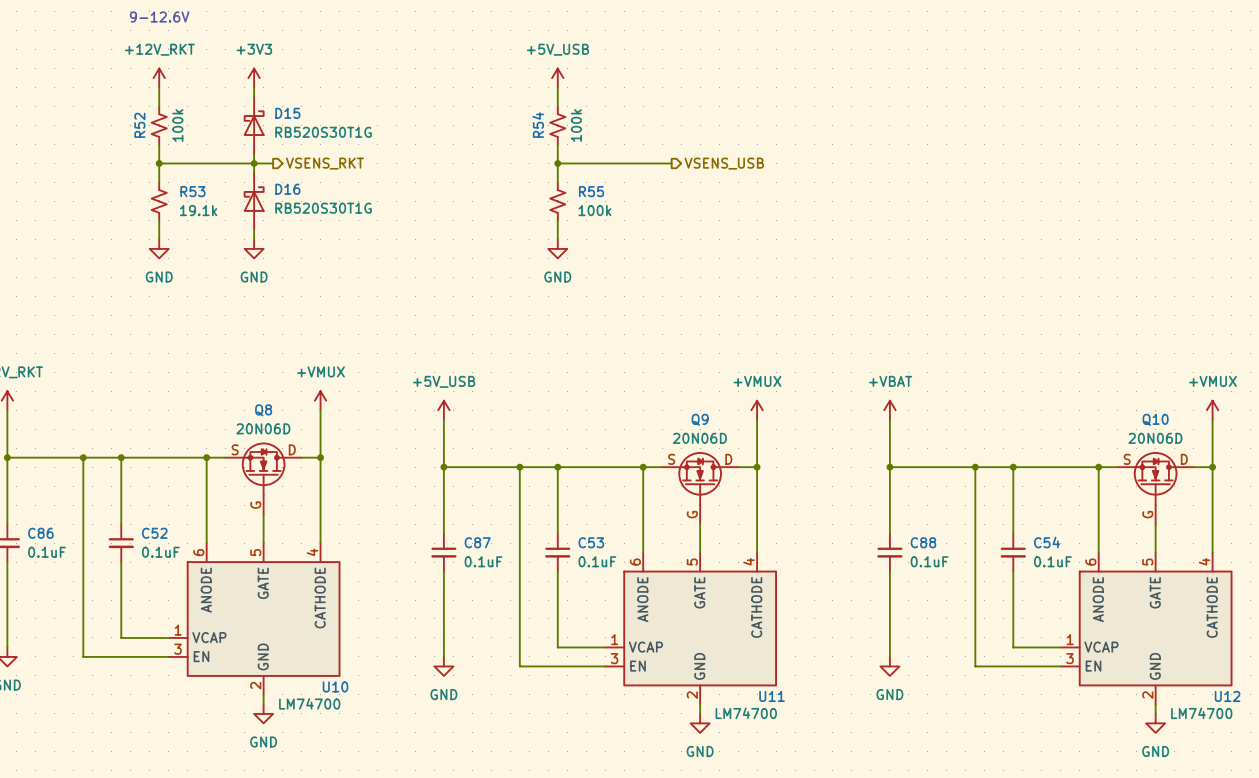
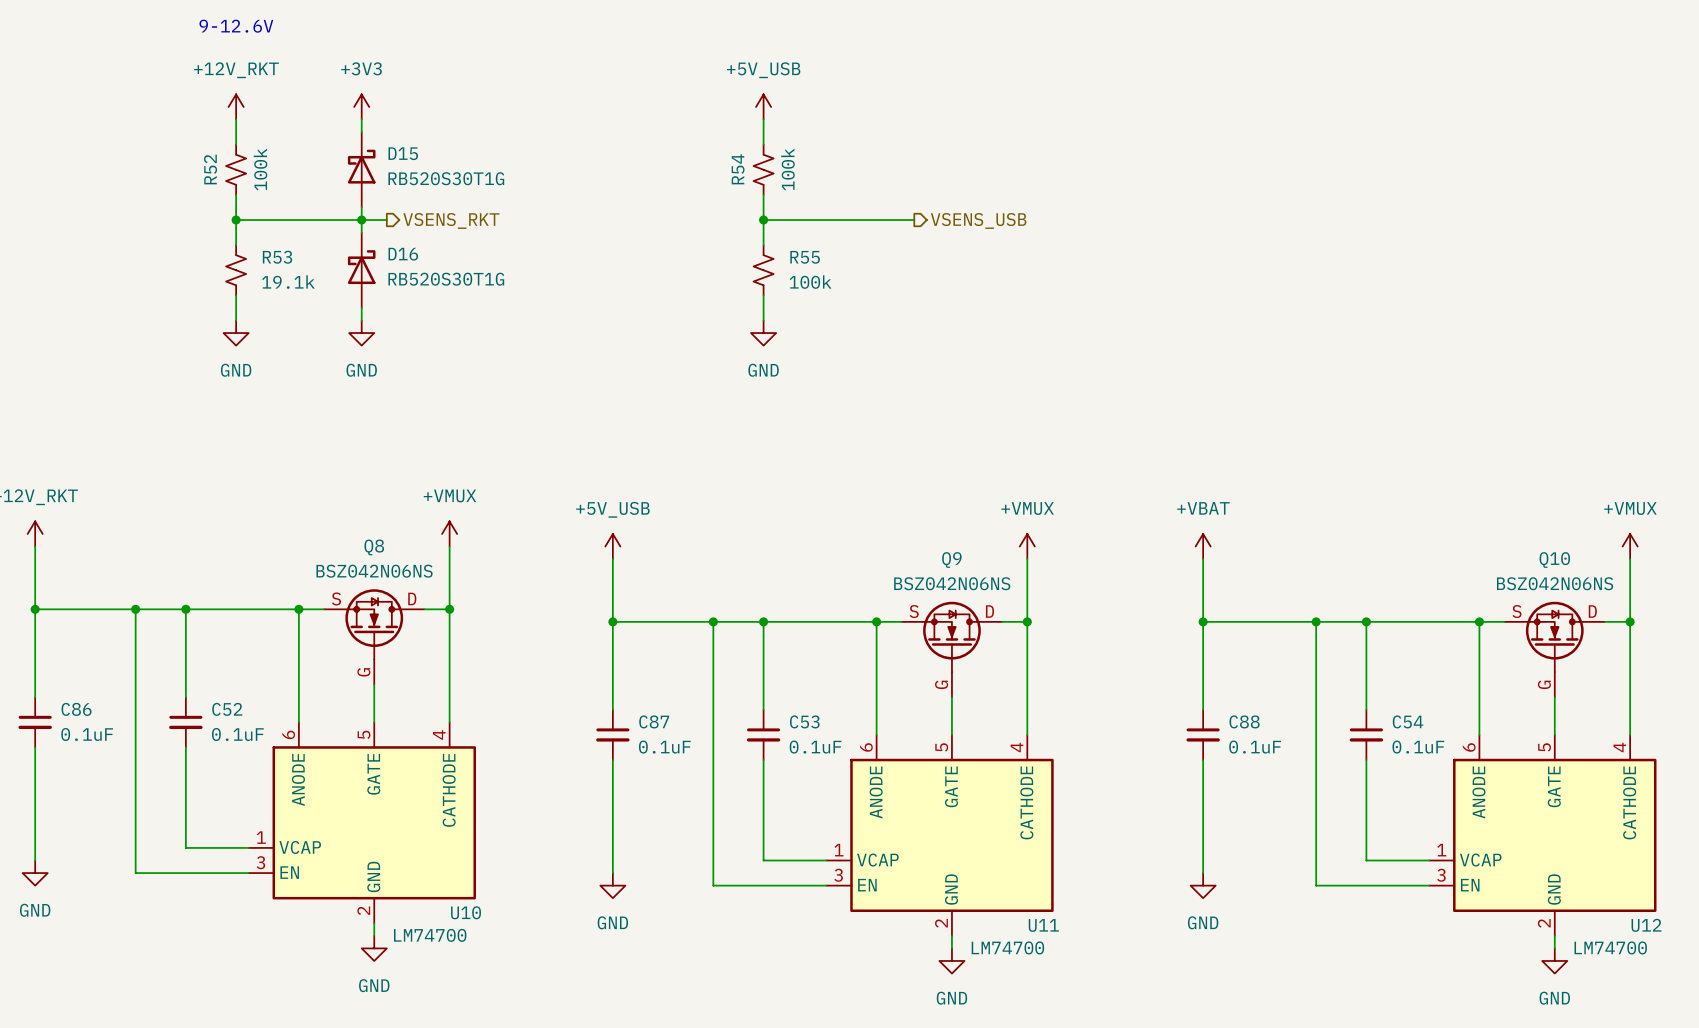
Q8 value: 20N06D (263, 428) -> BSZ042N06NS (374, 571)
Q9 value: 20N06D (699, 438) -> BSZ042N06NS (952, 583)
Q10 value: 20N06D (1155, 438) -> BSZ042N06NS (1555, 583)

